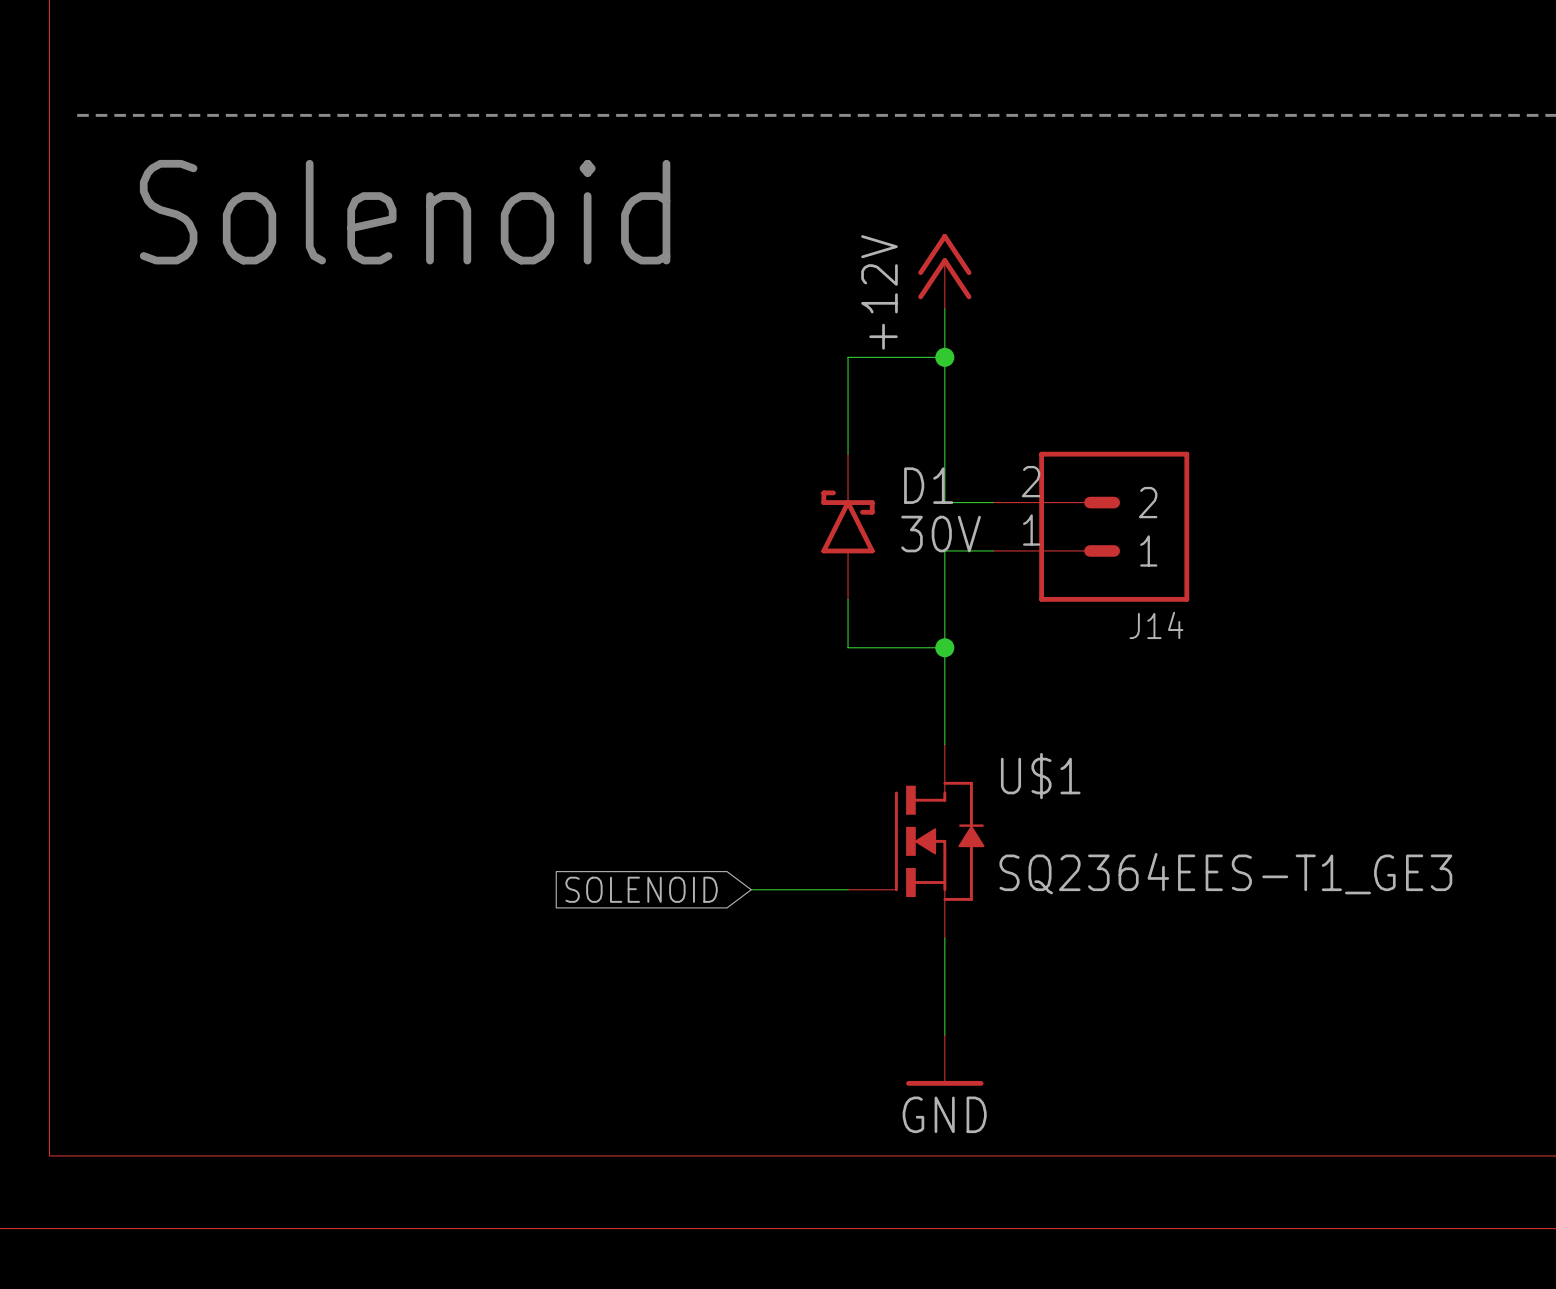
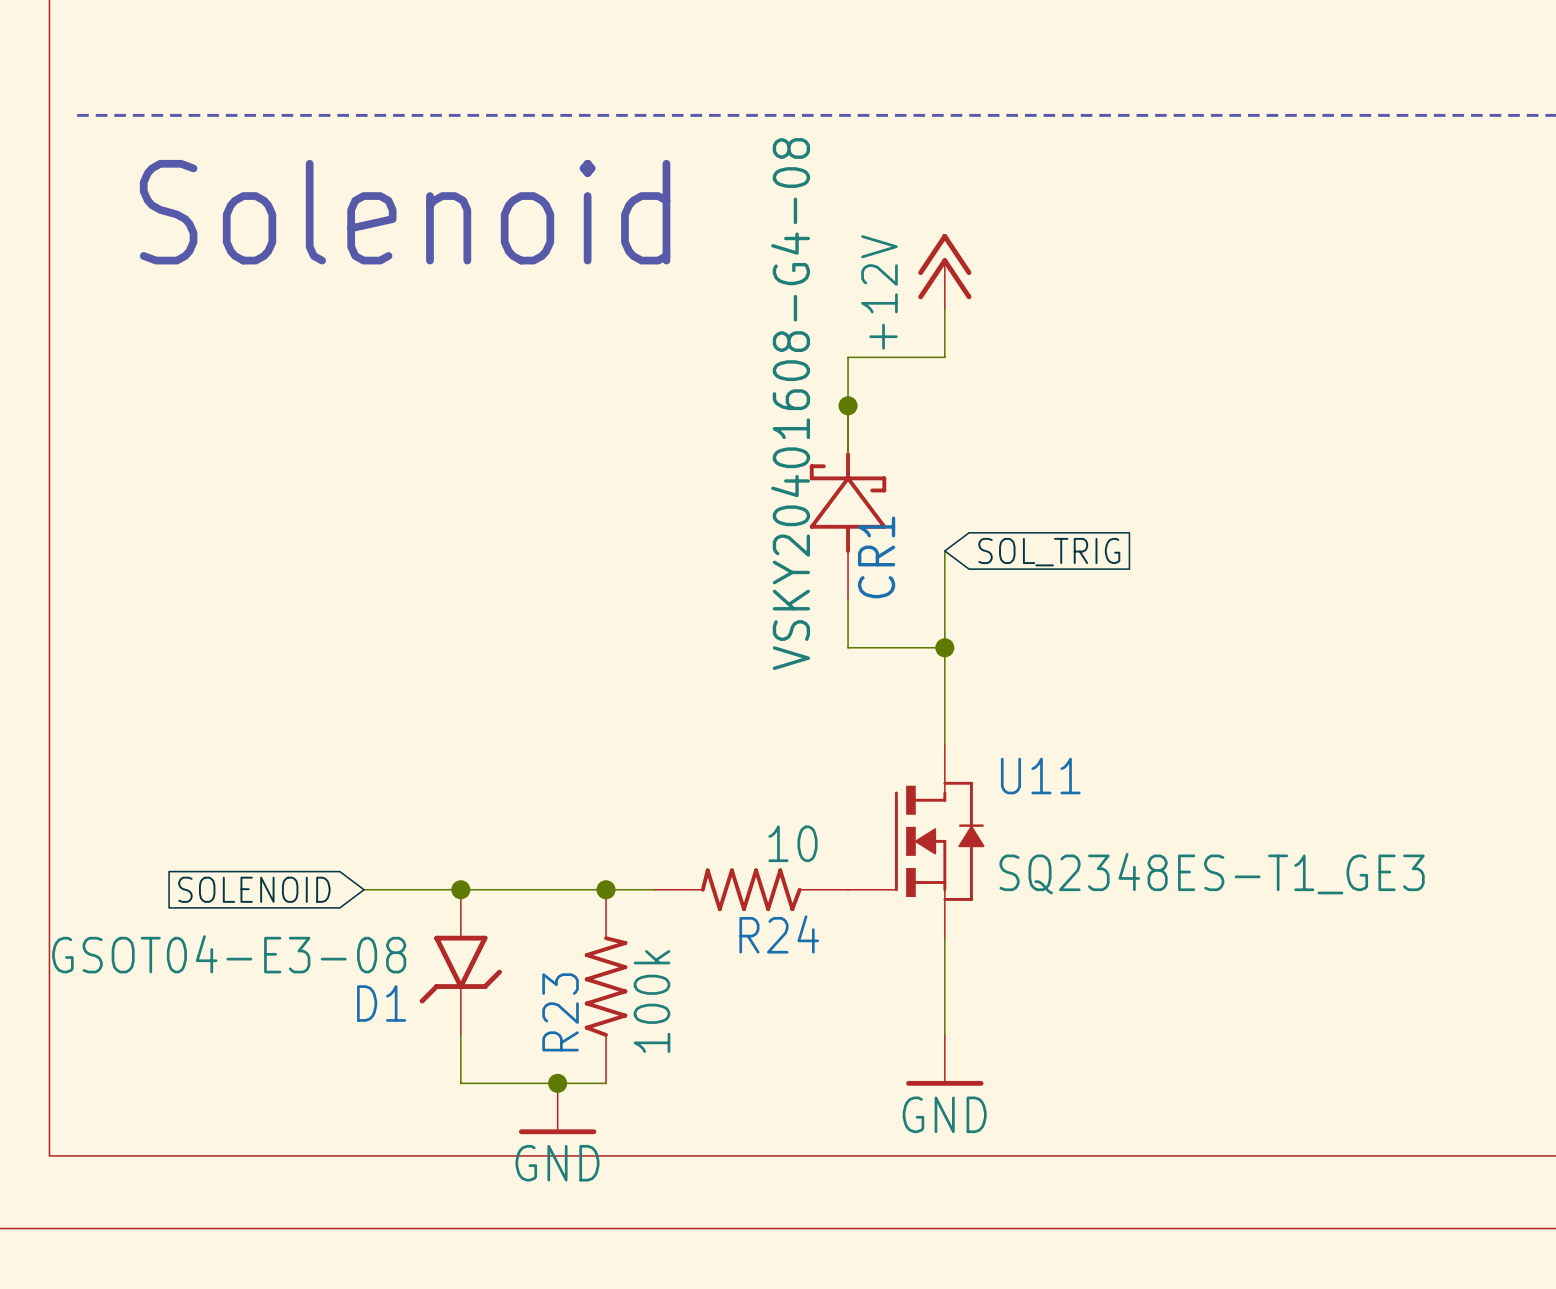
wire: (944, 357) (944, 502) (993, 502) -> none
junction position: (944, 357) -> (848, 405)
D1 symbol: [821, 454, 875, 600] -> [419, 889, 502, 1035]
D1 name position: D1 (928, 485) -> D1 (381, 1003)
CR1: none -> VSKY20401608-G4-08 (848, 502)
J14: (1091, 526) -> none
D1 value: 30V (941, 534) -> GSOT04-E3-08 (229, 954)
wire: (944, 550) (993, 550) -> none
global label: none -> SOL_TRIG (1049, 552)
U$1 name: U$1 (1040, 776) -> U11 (1040, 776)
U$1 value: SQ2364EES-T1_GE3 (1225, 873) -> SQ2348ES-T1_GE3 (1212, 873)
wire: none -> (364, 889) (654, 889)
junction: none -> (460, 889)
junction: none -> (606, 889)
global label position: SOLENOID (641, 889) -> SOLENOID (254, 889)
R24: none -> 10 (751, 889)
R23: none -> 100k (606, 986)
wire: none -> (460, 1034) (460, 1083) (606, 1083)
junction: none -> (557, 1083)
power symbol: none -> GND (557, 1108)

